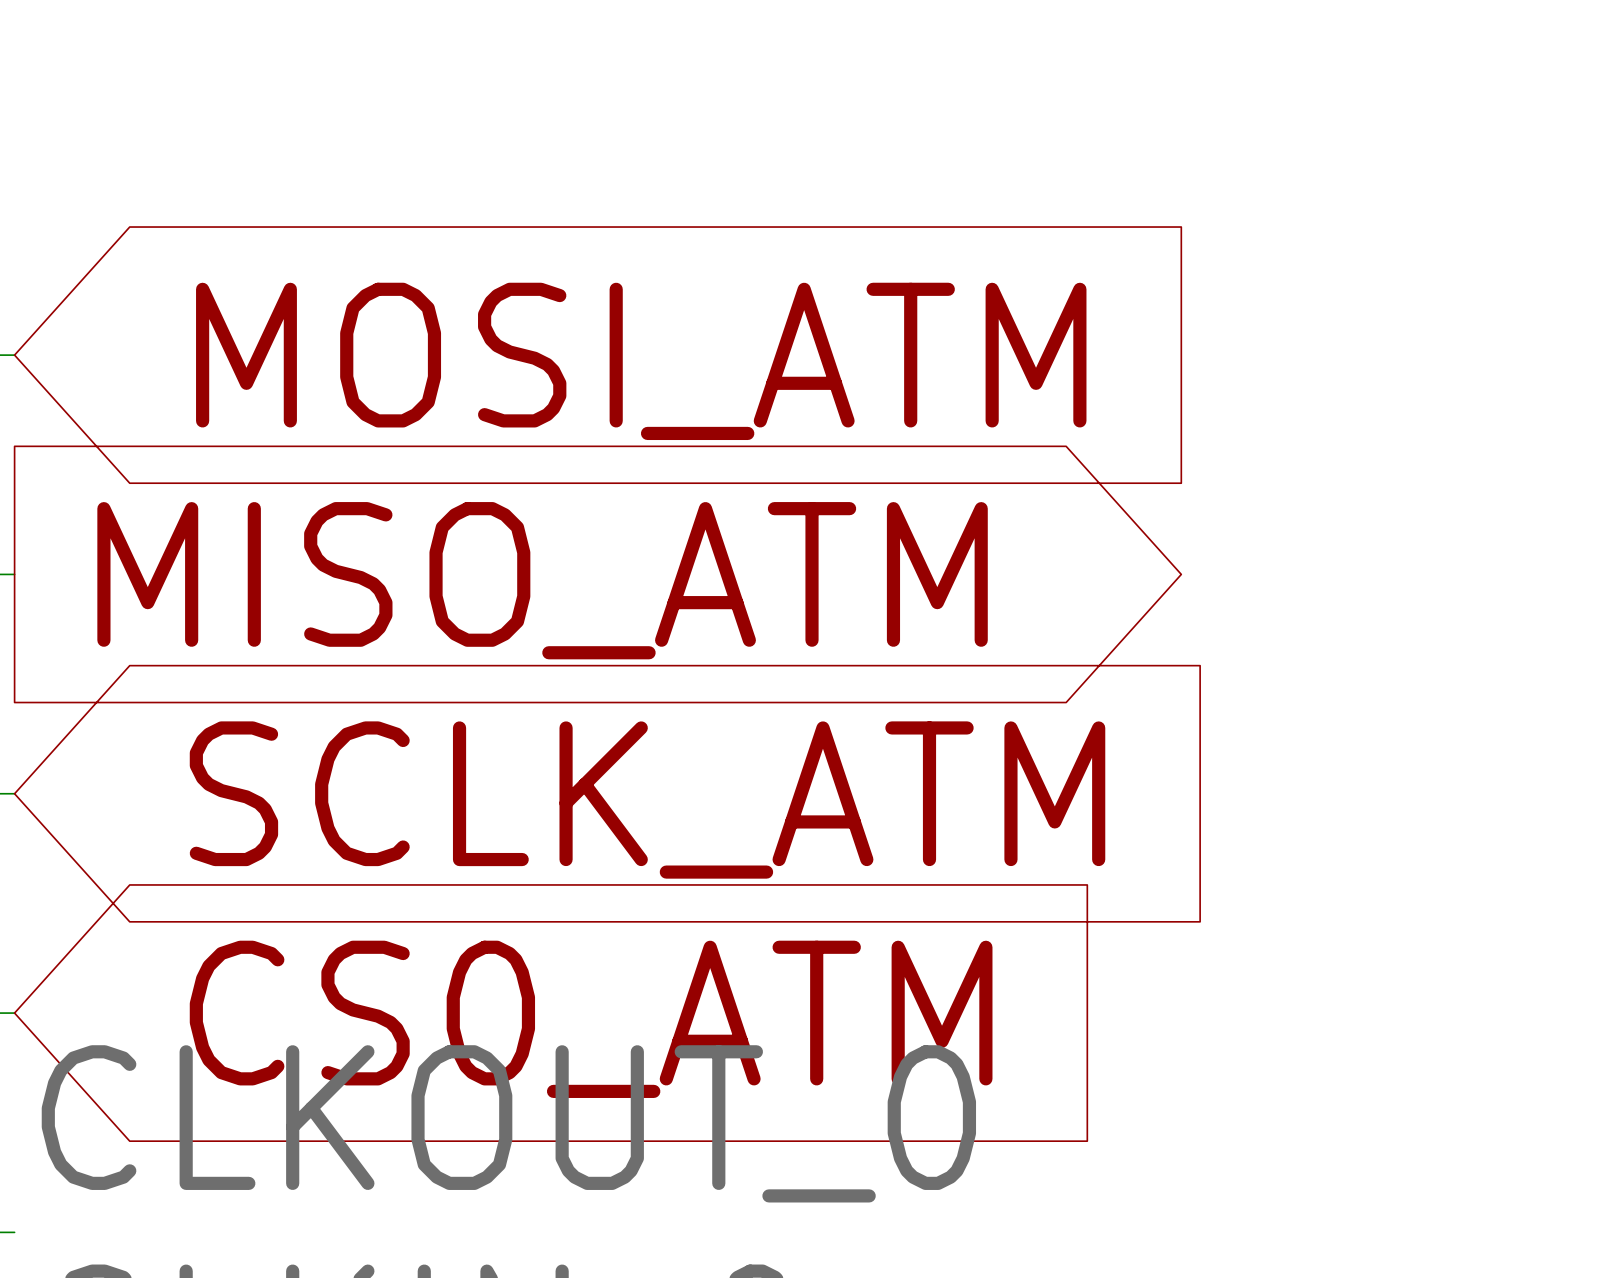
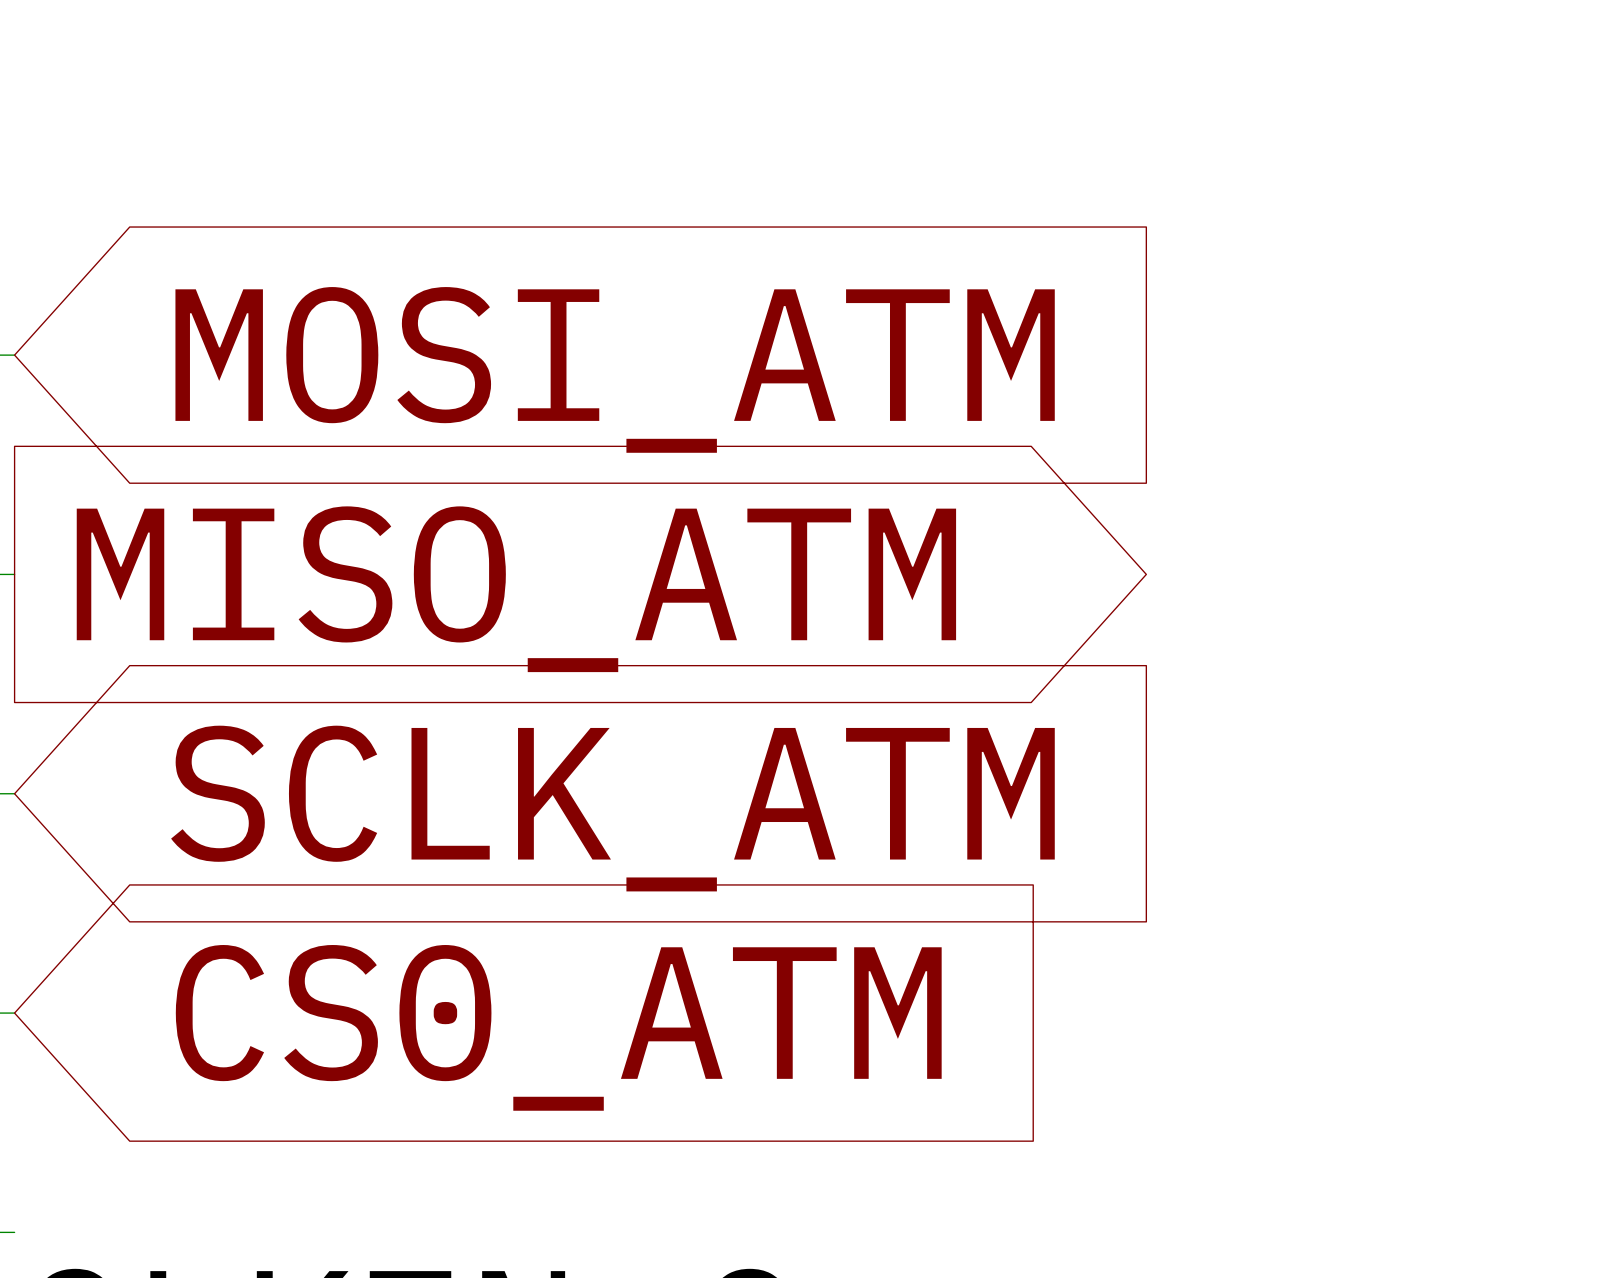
label: CLKOUT_0 (508, 1123) -> none

